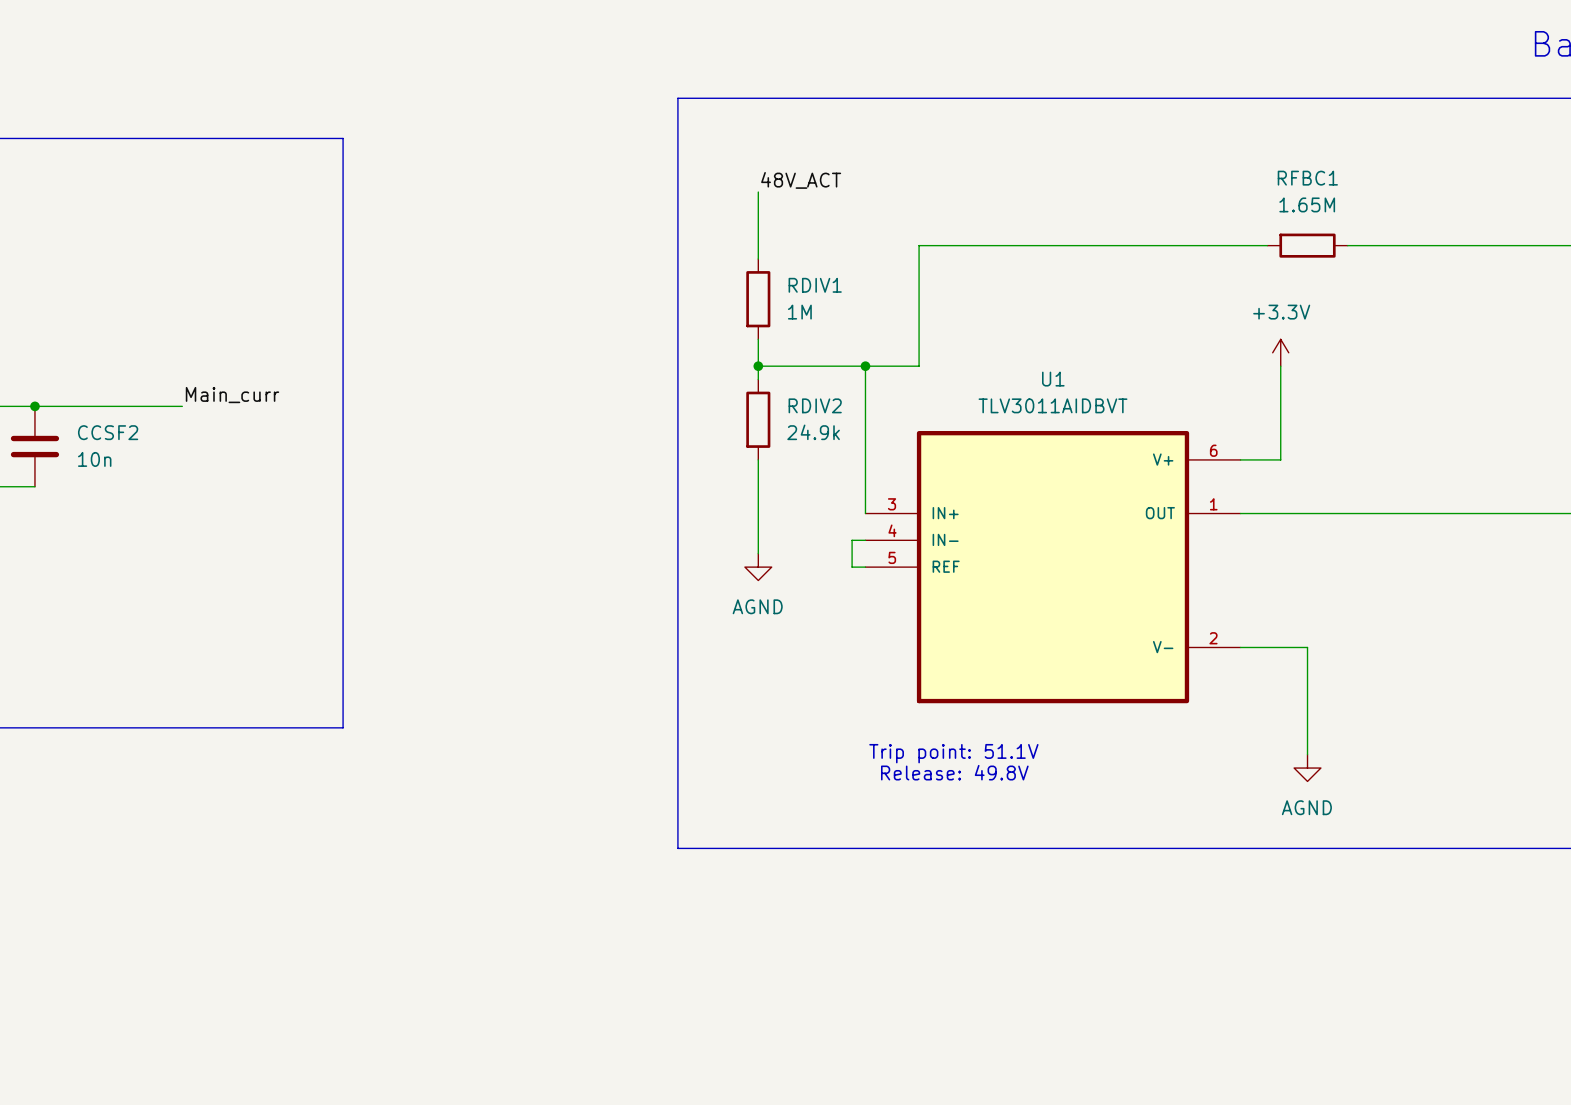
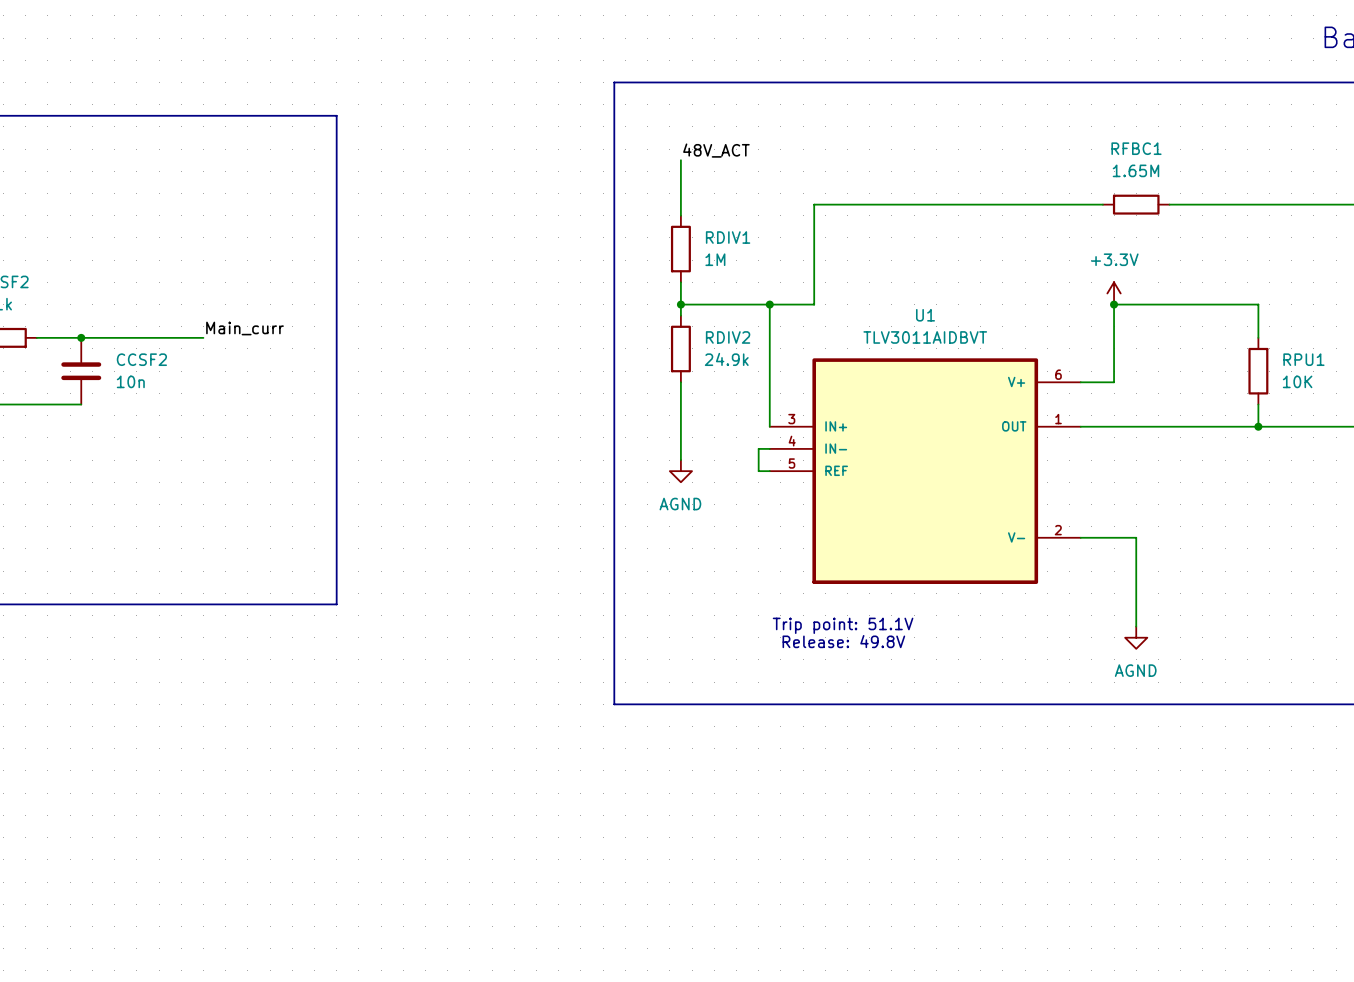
wire: none -> (1114, 304) (1258, 304) (1258, 337)
junction: none -> (1114, 304)
RPU1: none -> 10K (1258, 371)
wire: none -> (1258, 404) (1258, 426)
junction: none -> (1258, 426)

